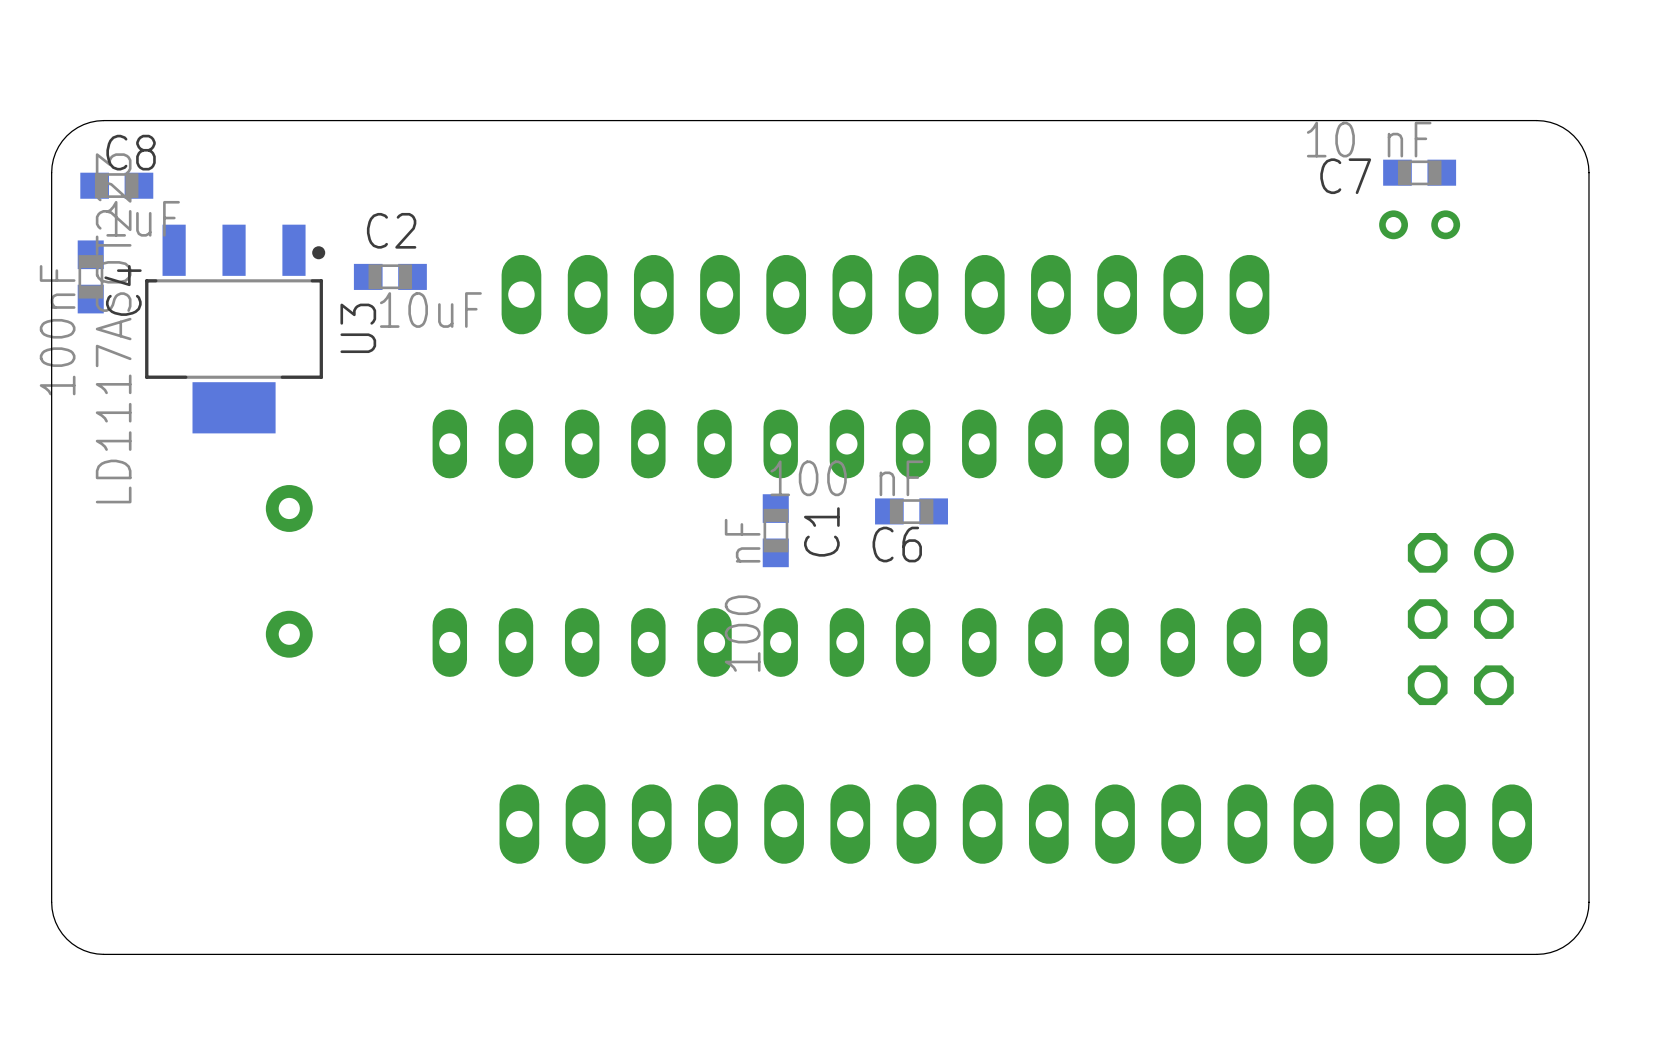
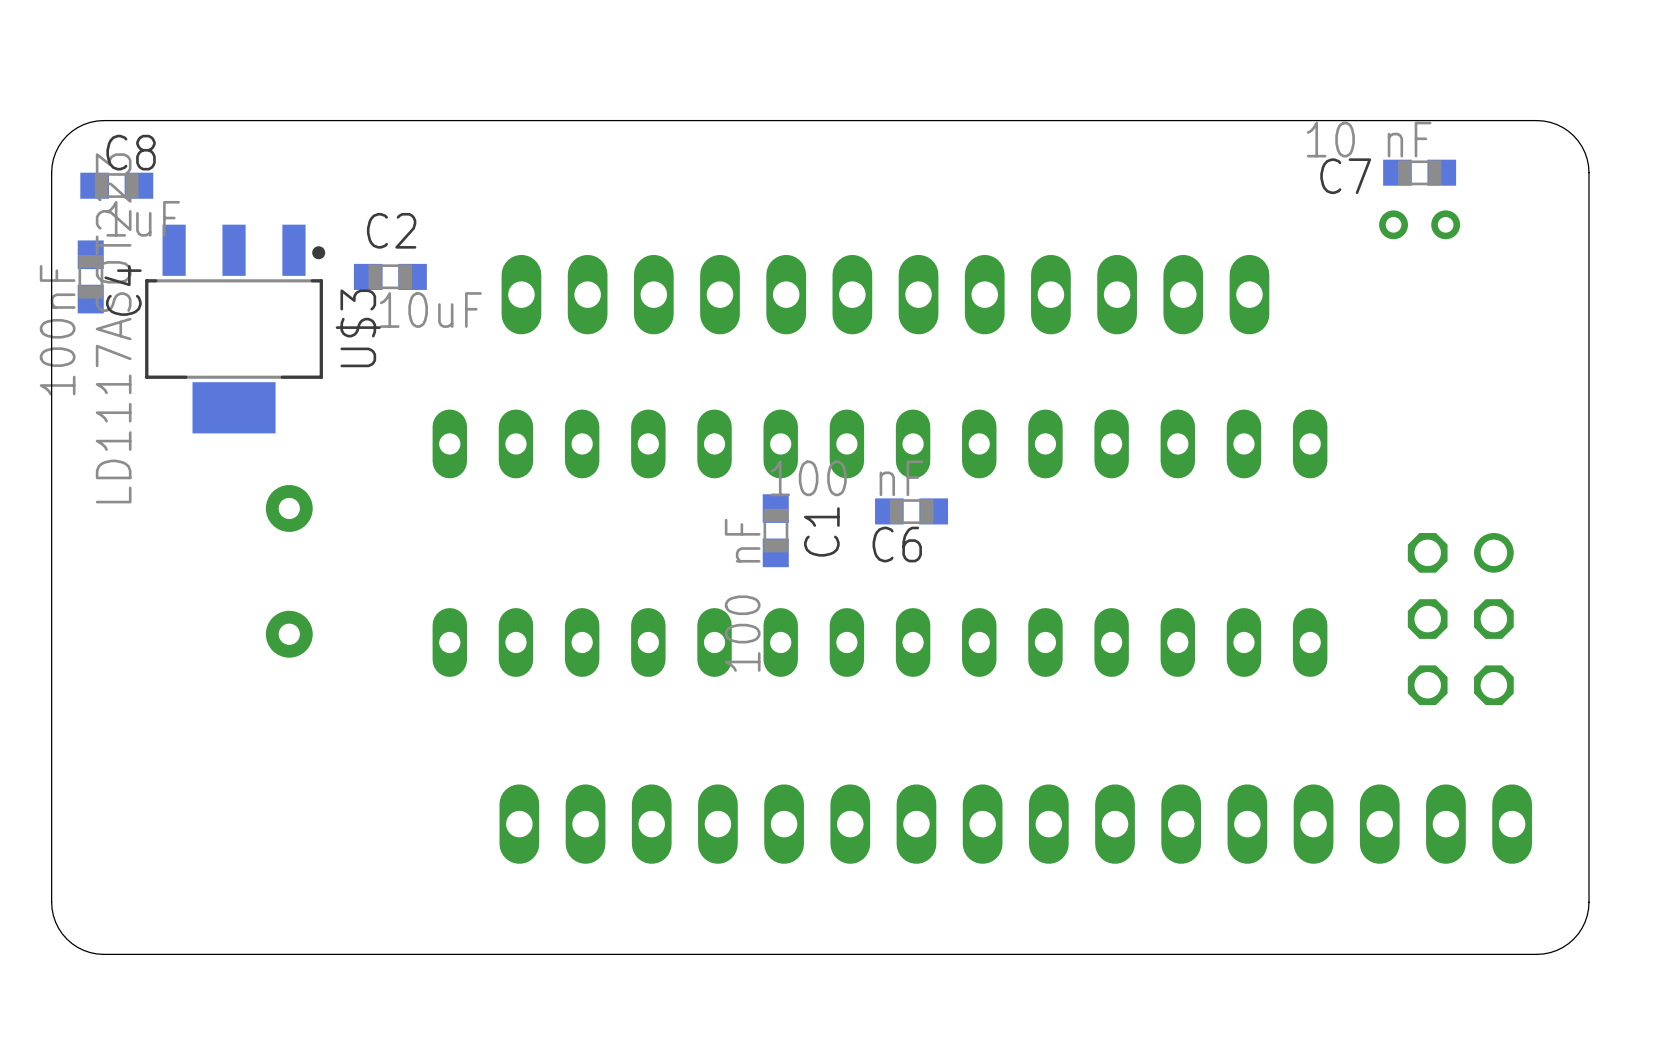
U3 name: U3 (358, 328) -> U$3 (358, 328)

